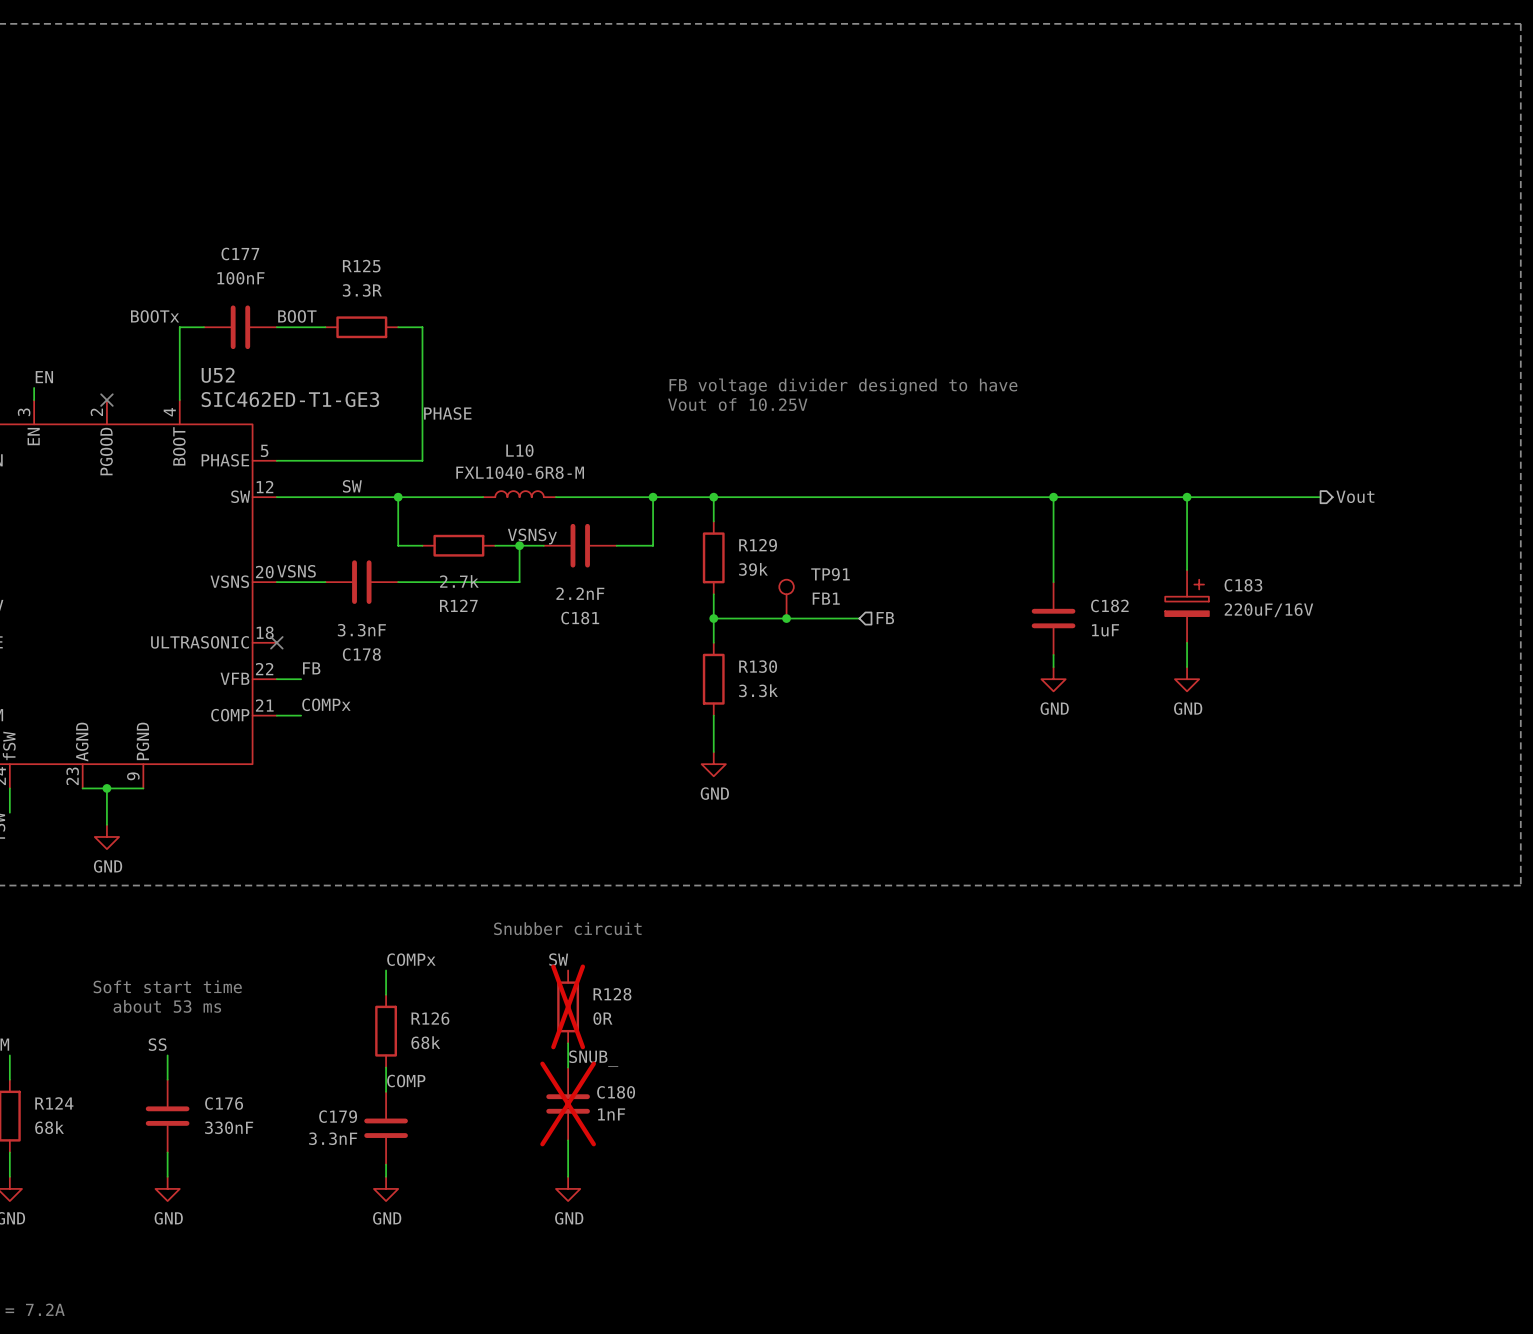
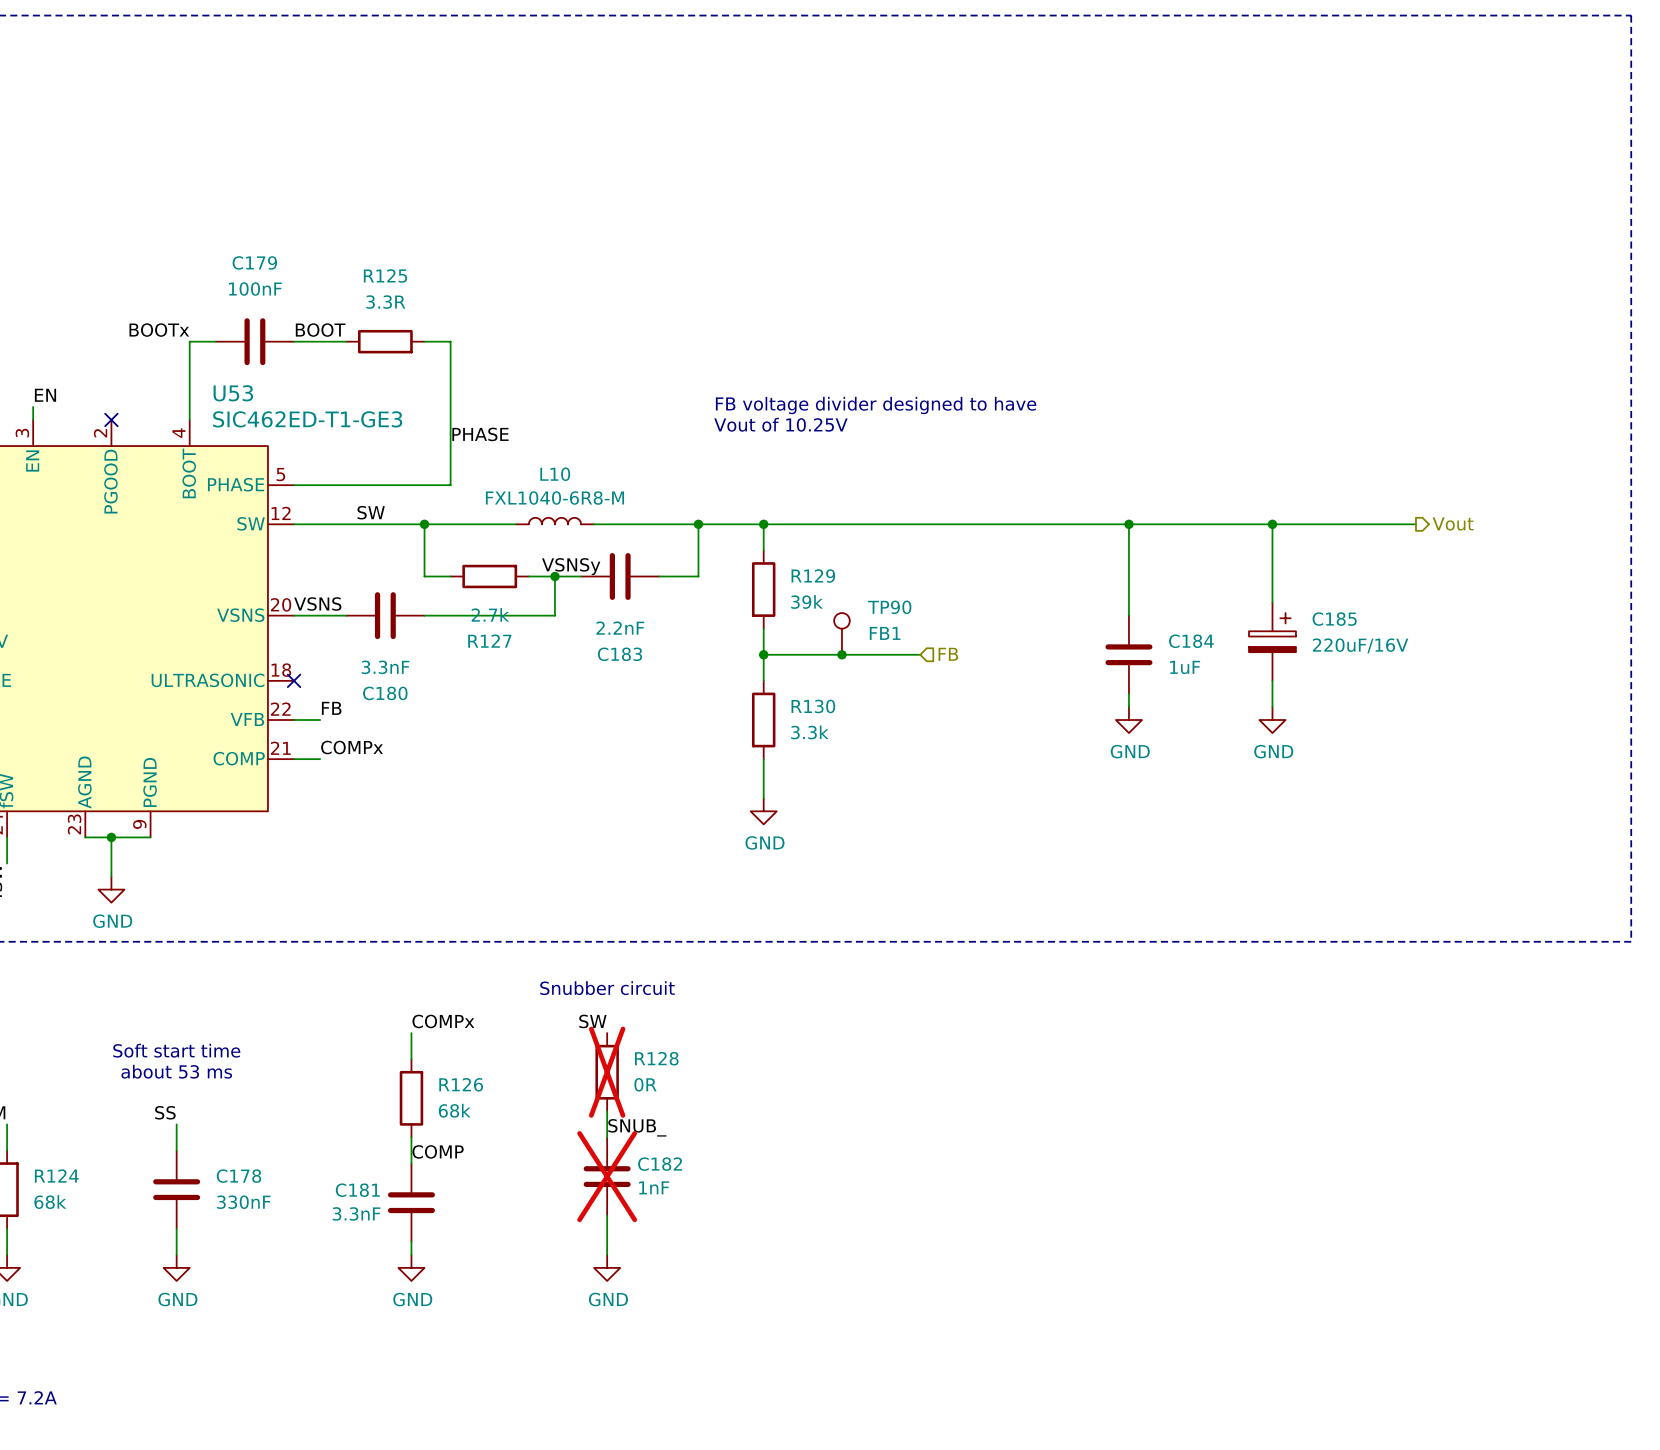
C177 name: C177 (240, 254) -> C179 (254, 262)
U52 name: U52 (218, 375) -> U53 (233, 393)
TP91 name: TP91 (830, 574) -> TP90 (889, 607)
C183 name: C183 (1243, 585) -> C185 (1334, 619)
C182 name: C182 (1109, 605) -> C184 (1191, 641)
C181 name: C181 (580, 618) -> C183 (619, 654)
C178 name: C178 (361, 654) -> C180 (385, 693)
C180 name: C180 (616, 1092) -> C182 (660, 1164)
C176 name: C176 (224, 1103) -> C178 (239, 1176)
C179 name: C179 (338, 1116) -> C181 (357, 1190)

